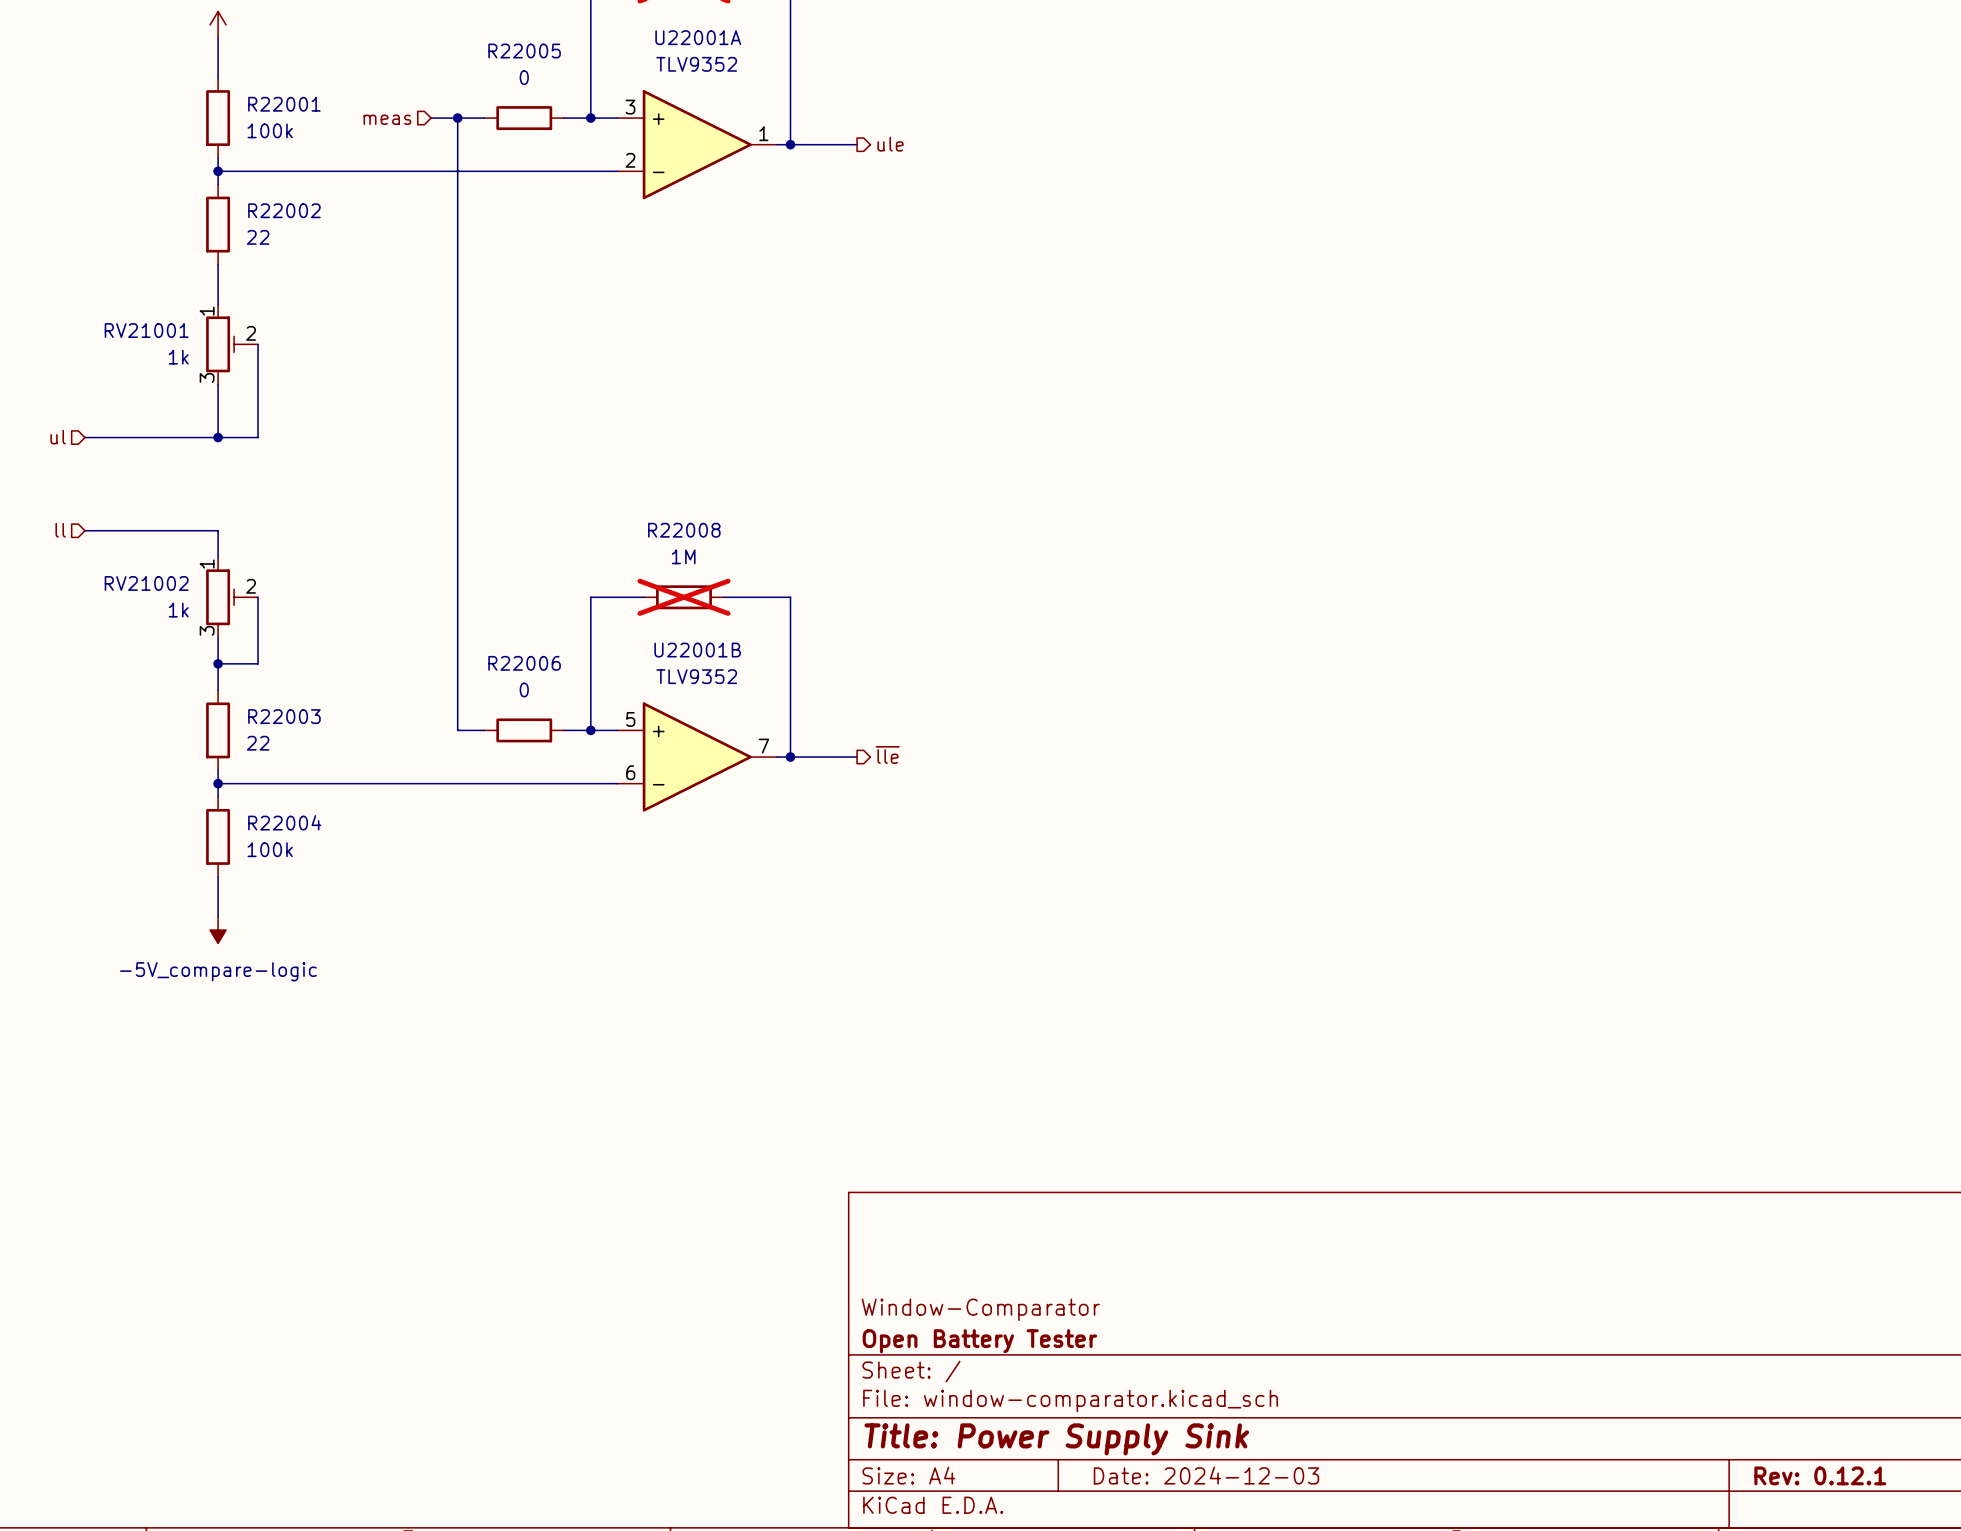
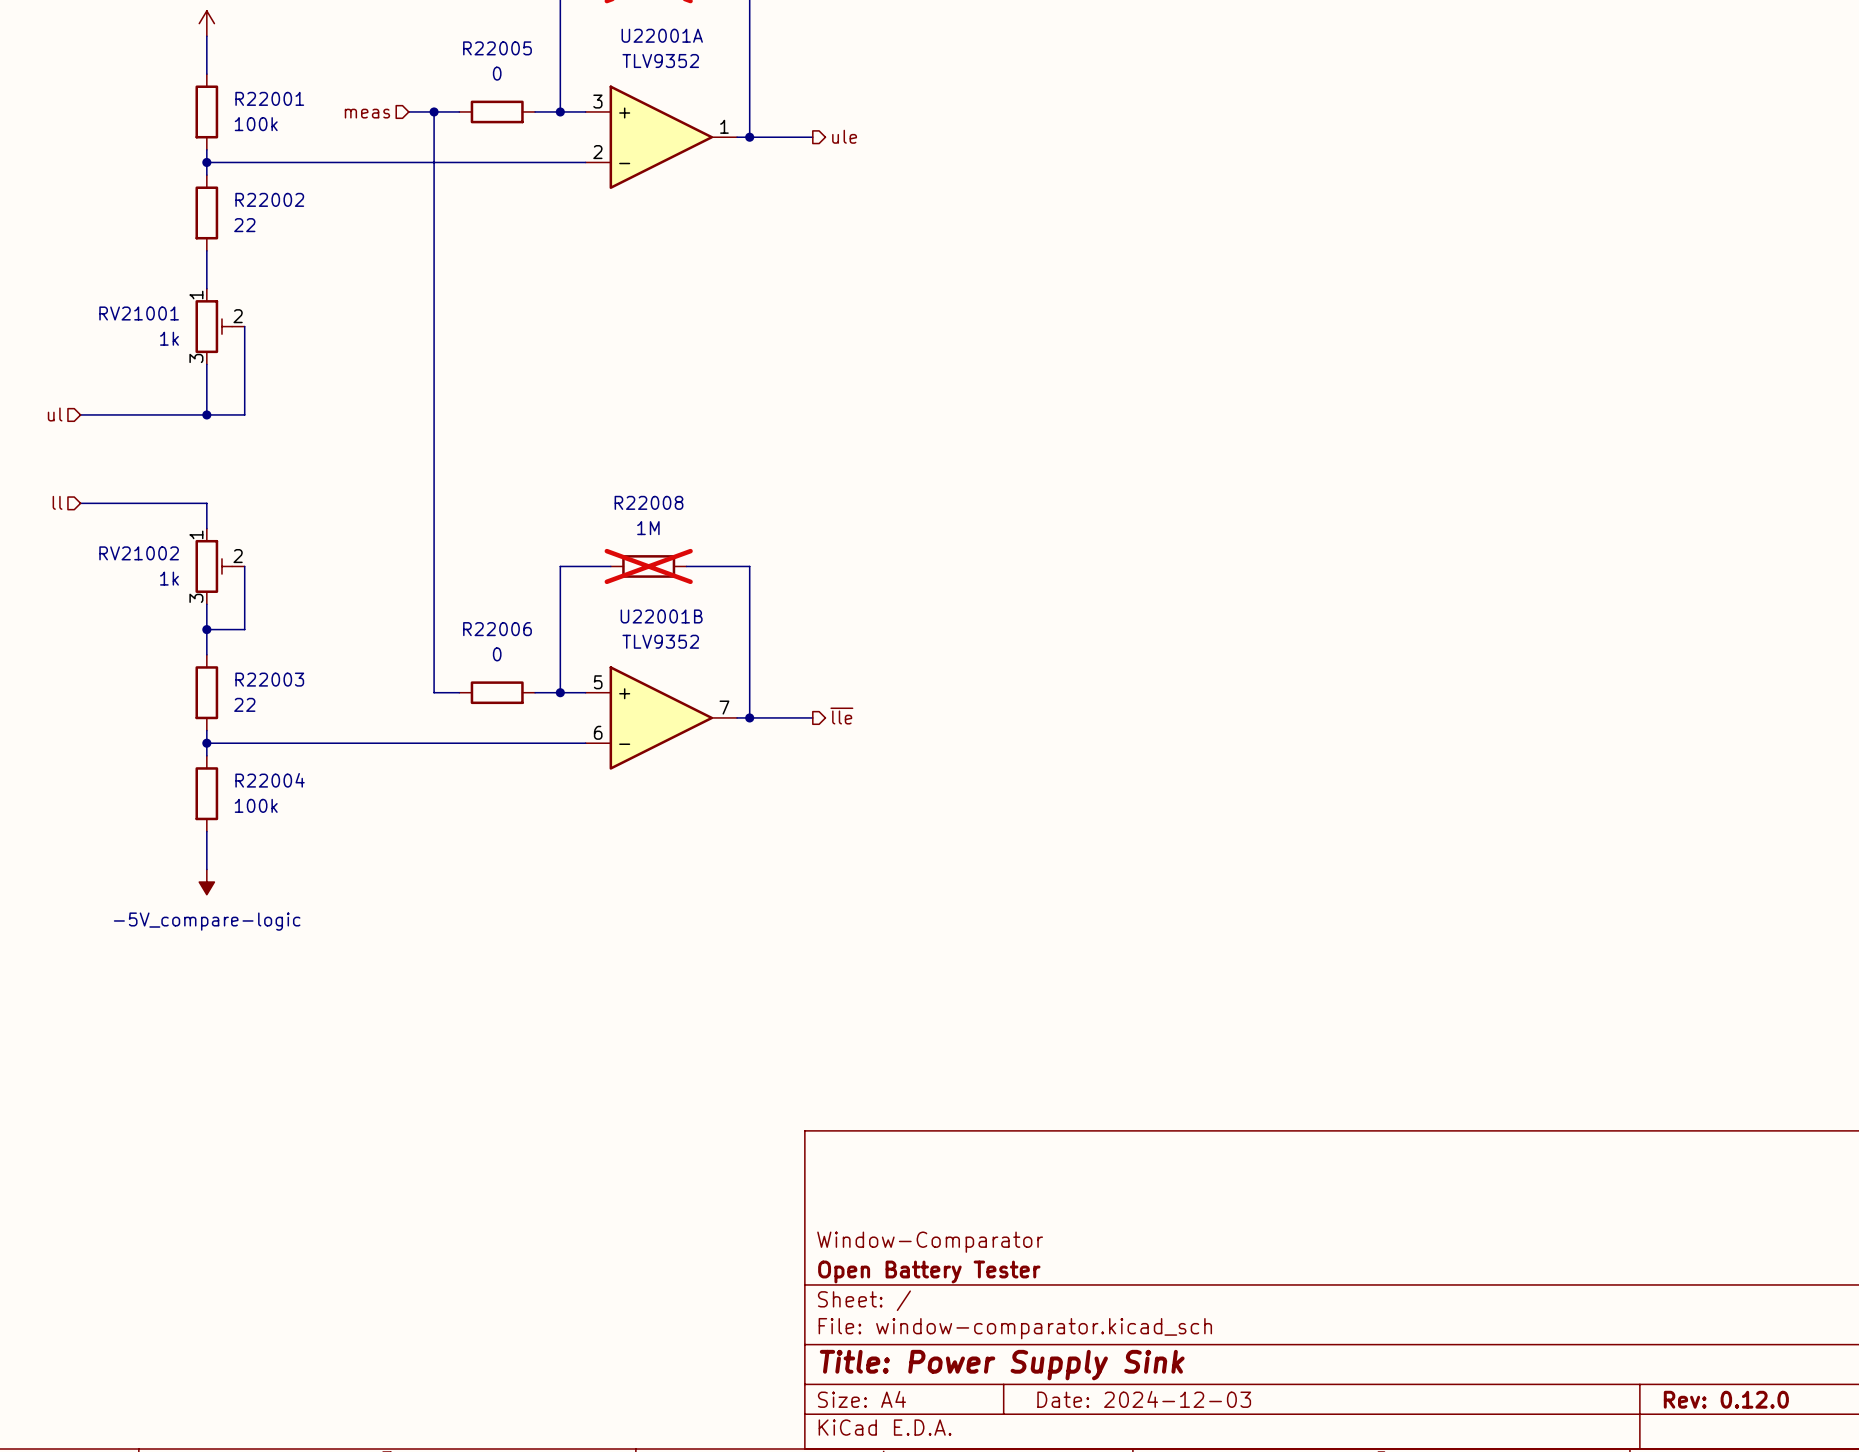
title block: Rev: 0.12.1 (1820, 1475) -> Rev: 0.12.0 (1726, 1399)

